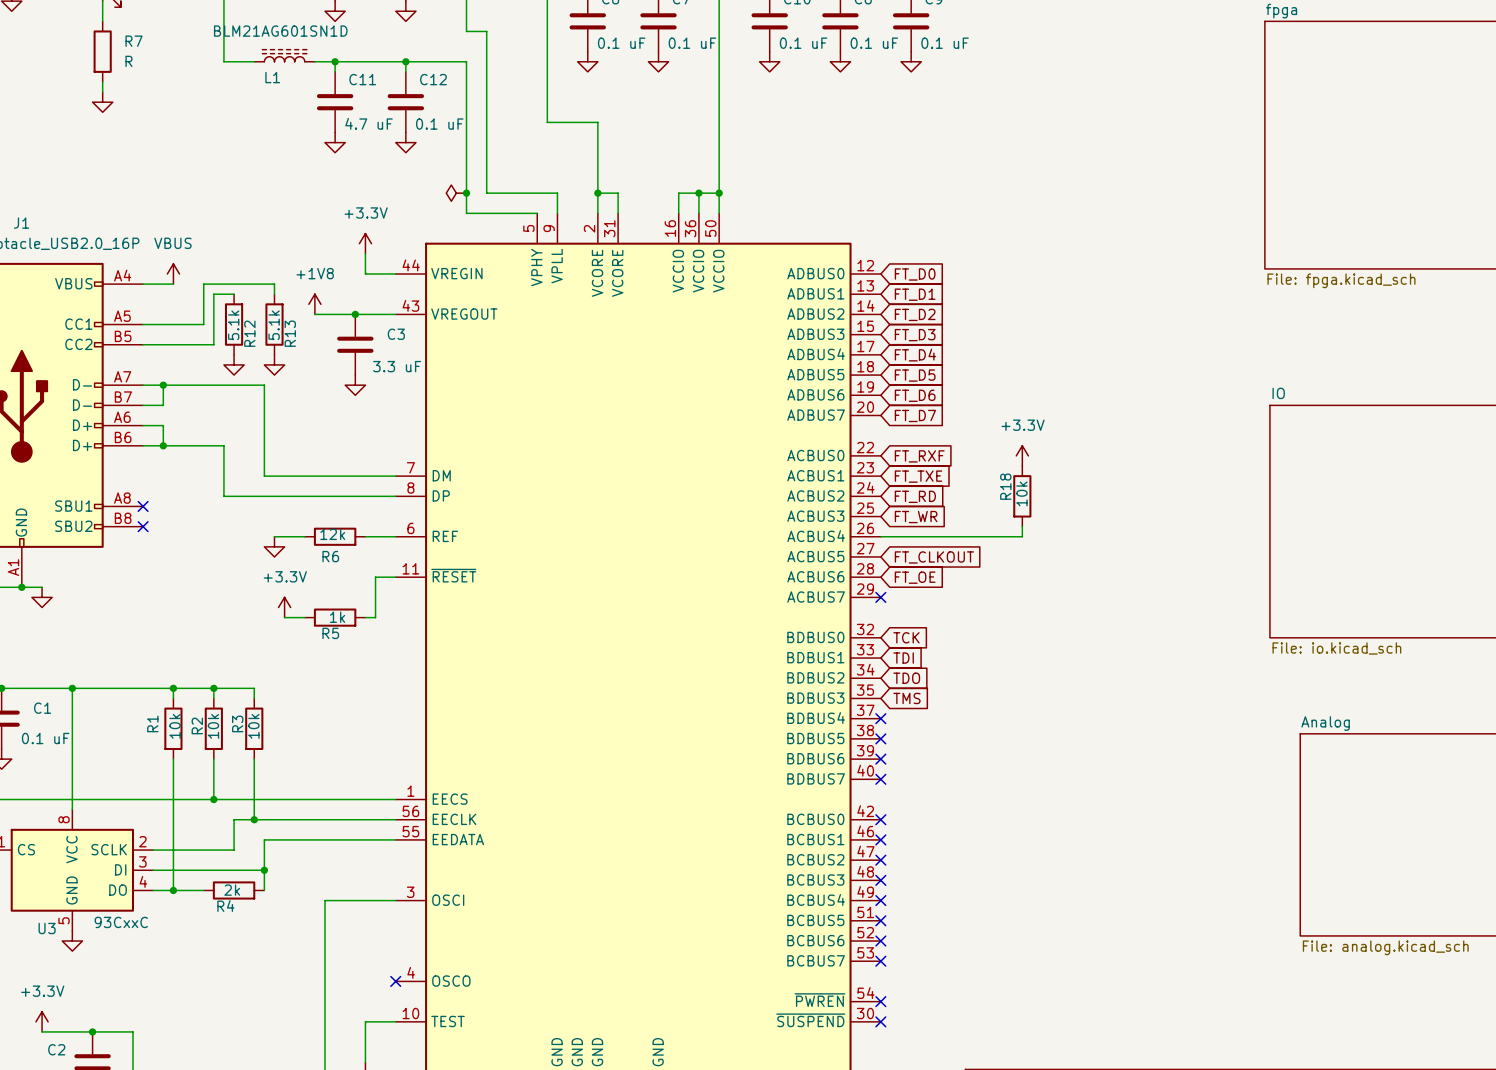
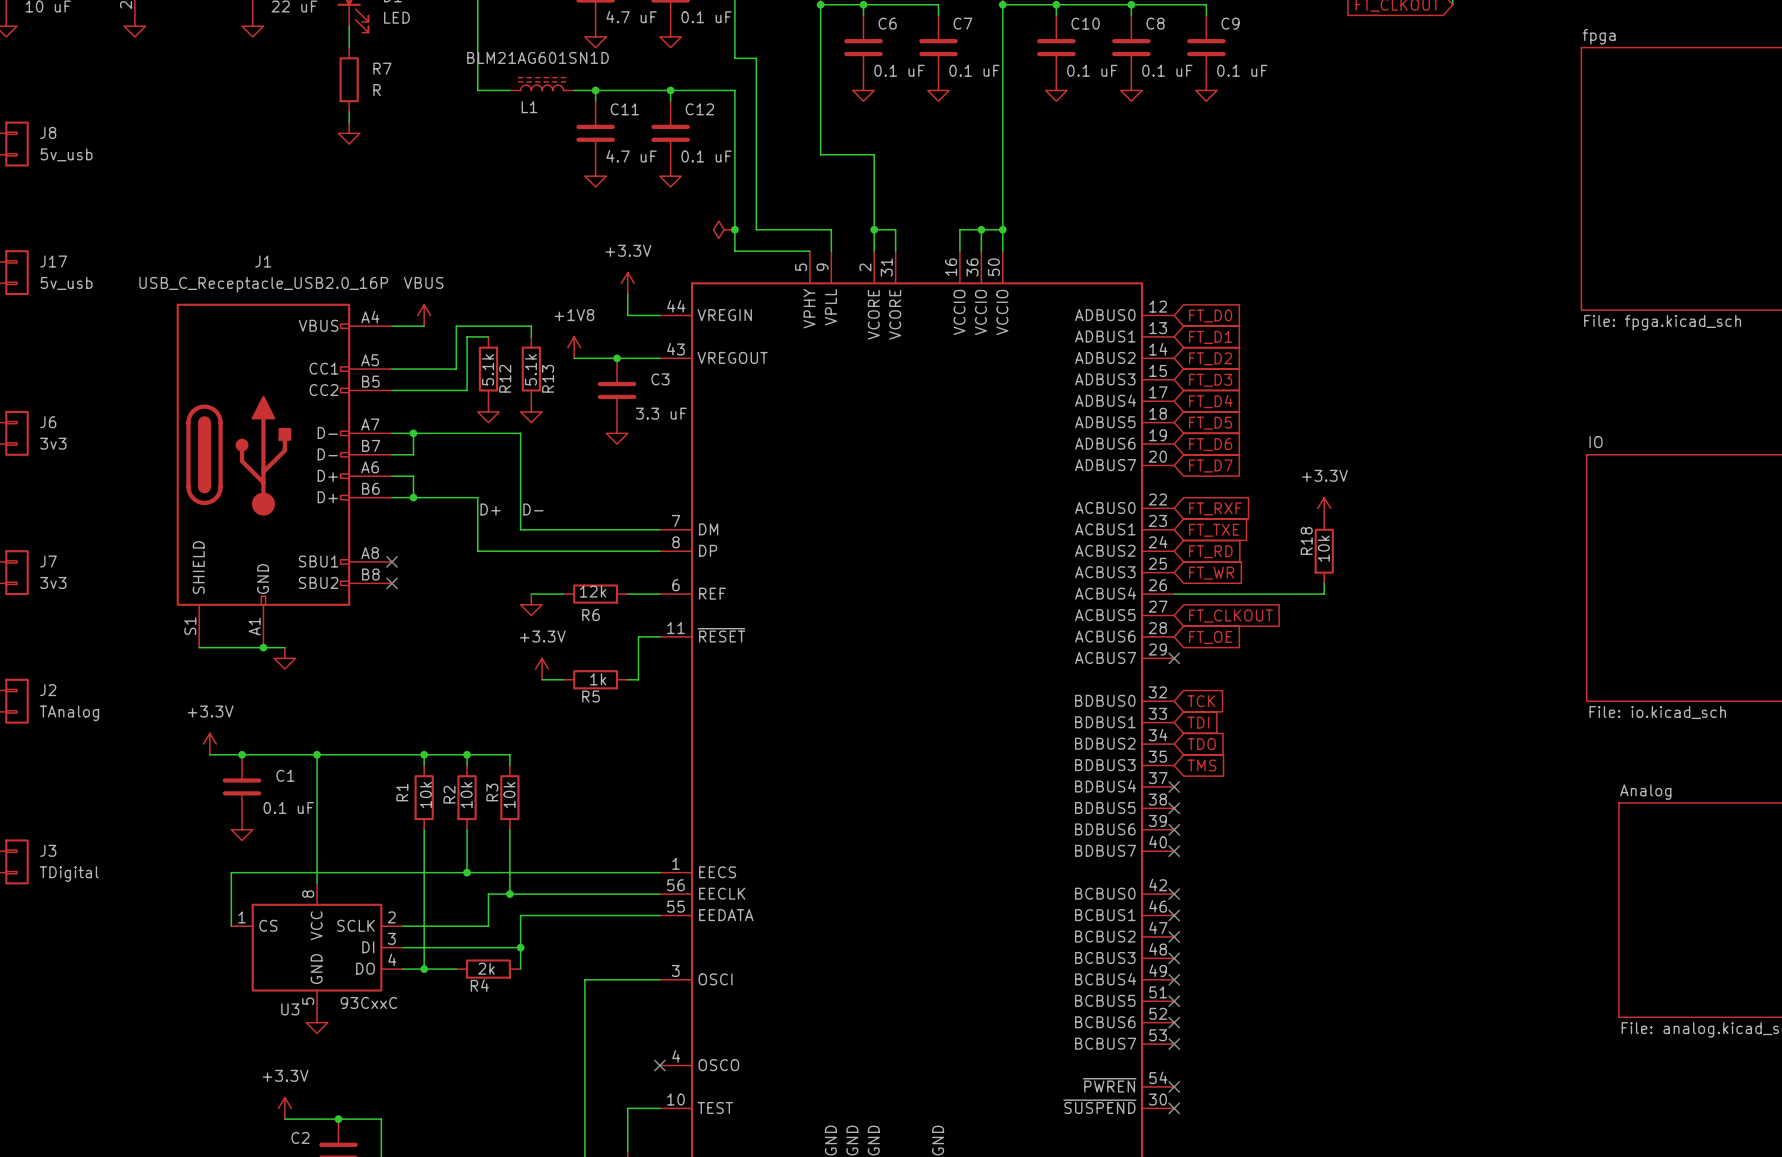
label: none -> D+ (490, 509)
label: none -> D- (533, 509)

